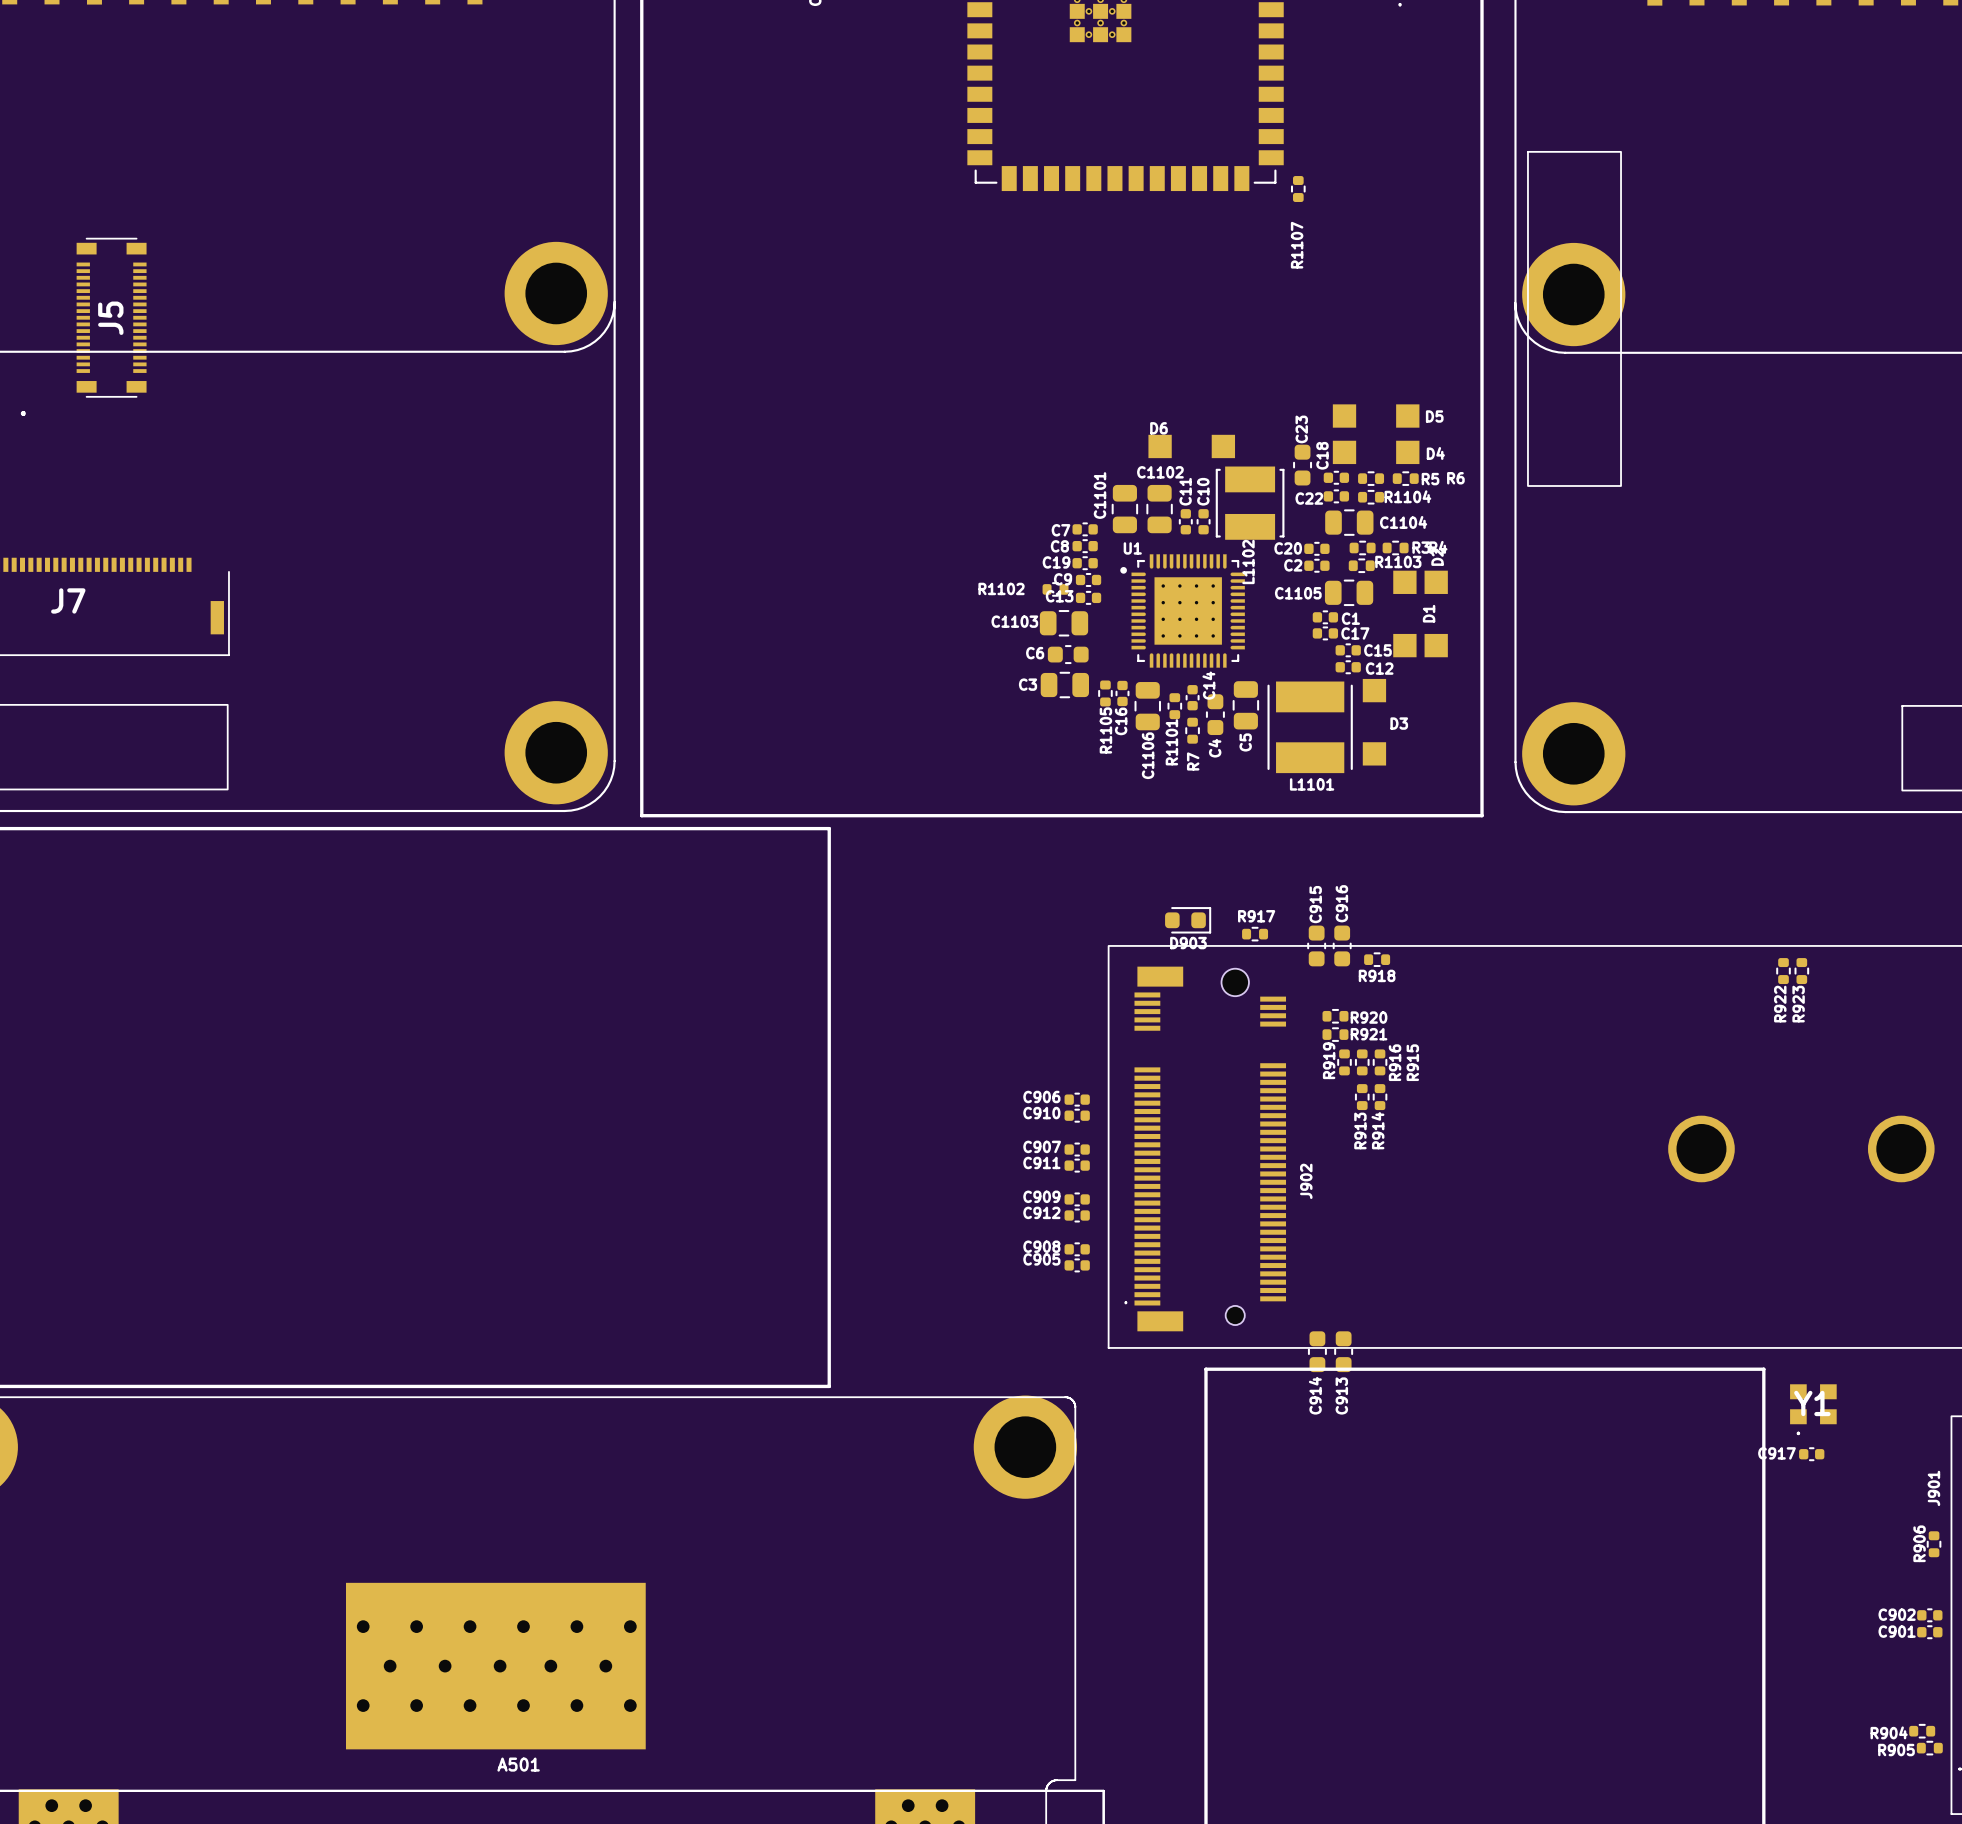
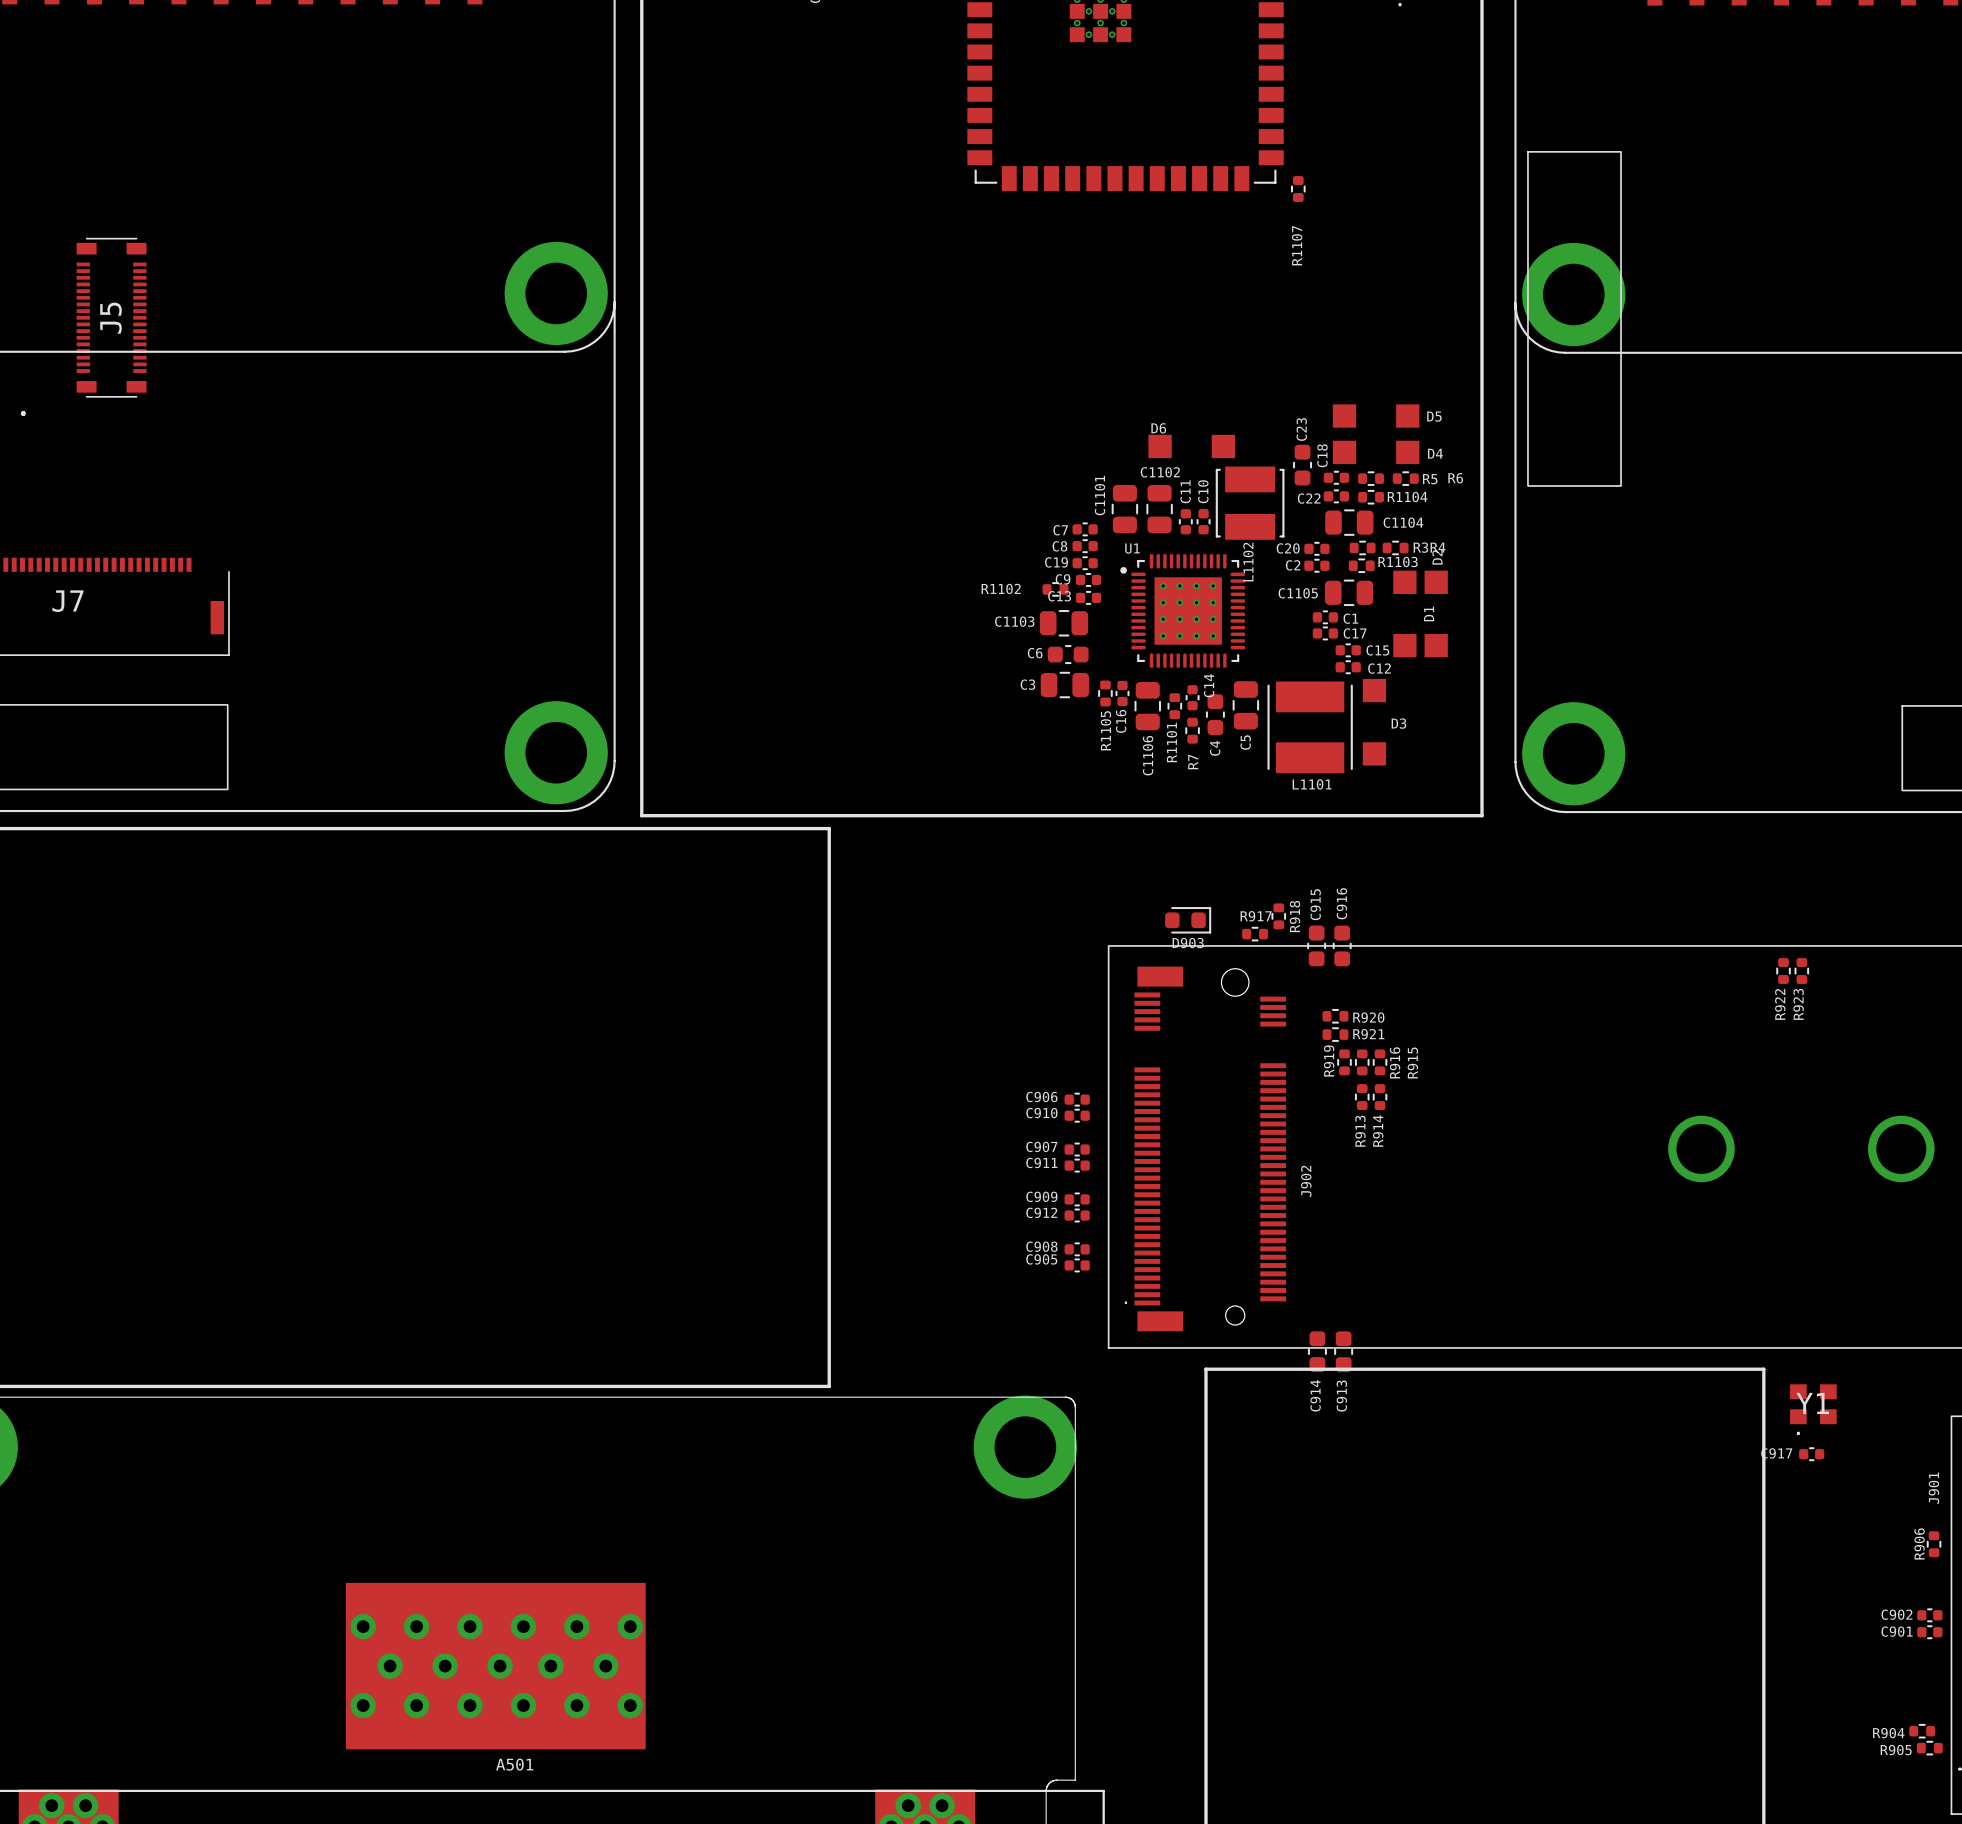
R918 rotation: 0° (1377, 959) -> 90° clockwise (1278, 916)
R918 position: (1377, 959) -> (1278, 916)

